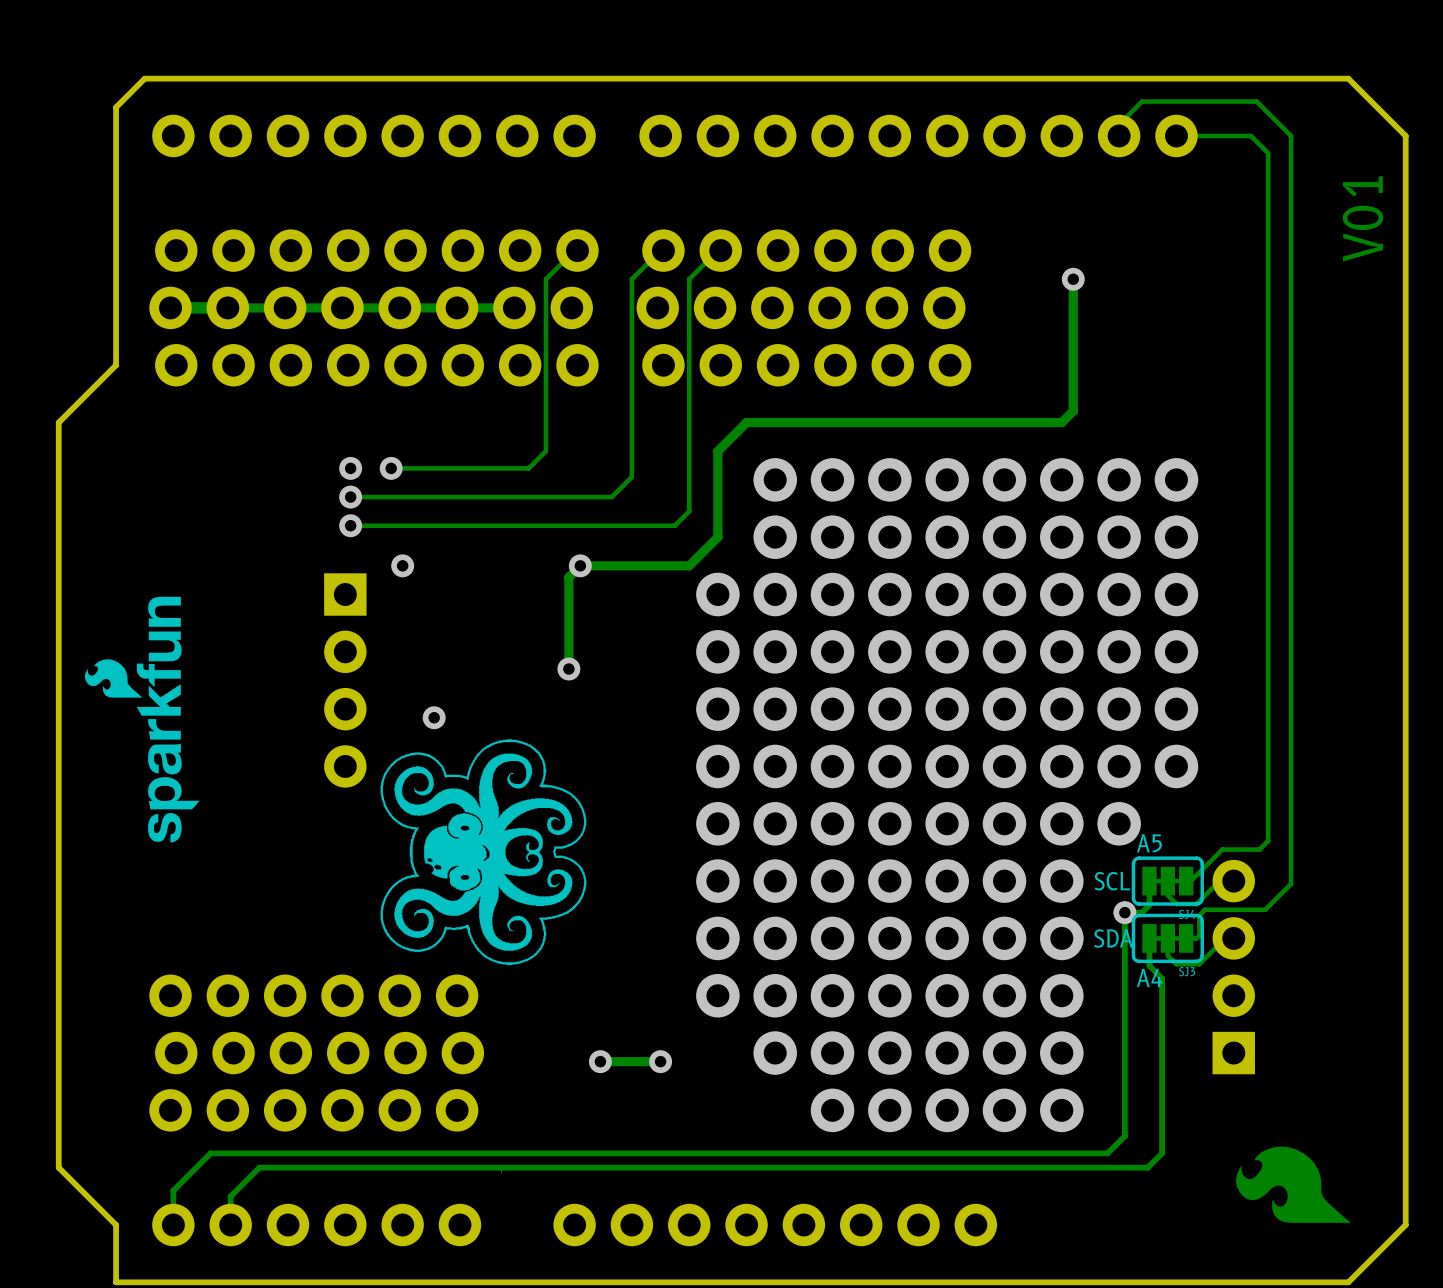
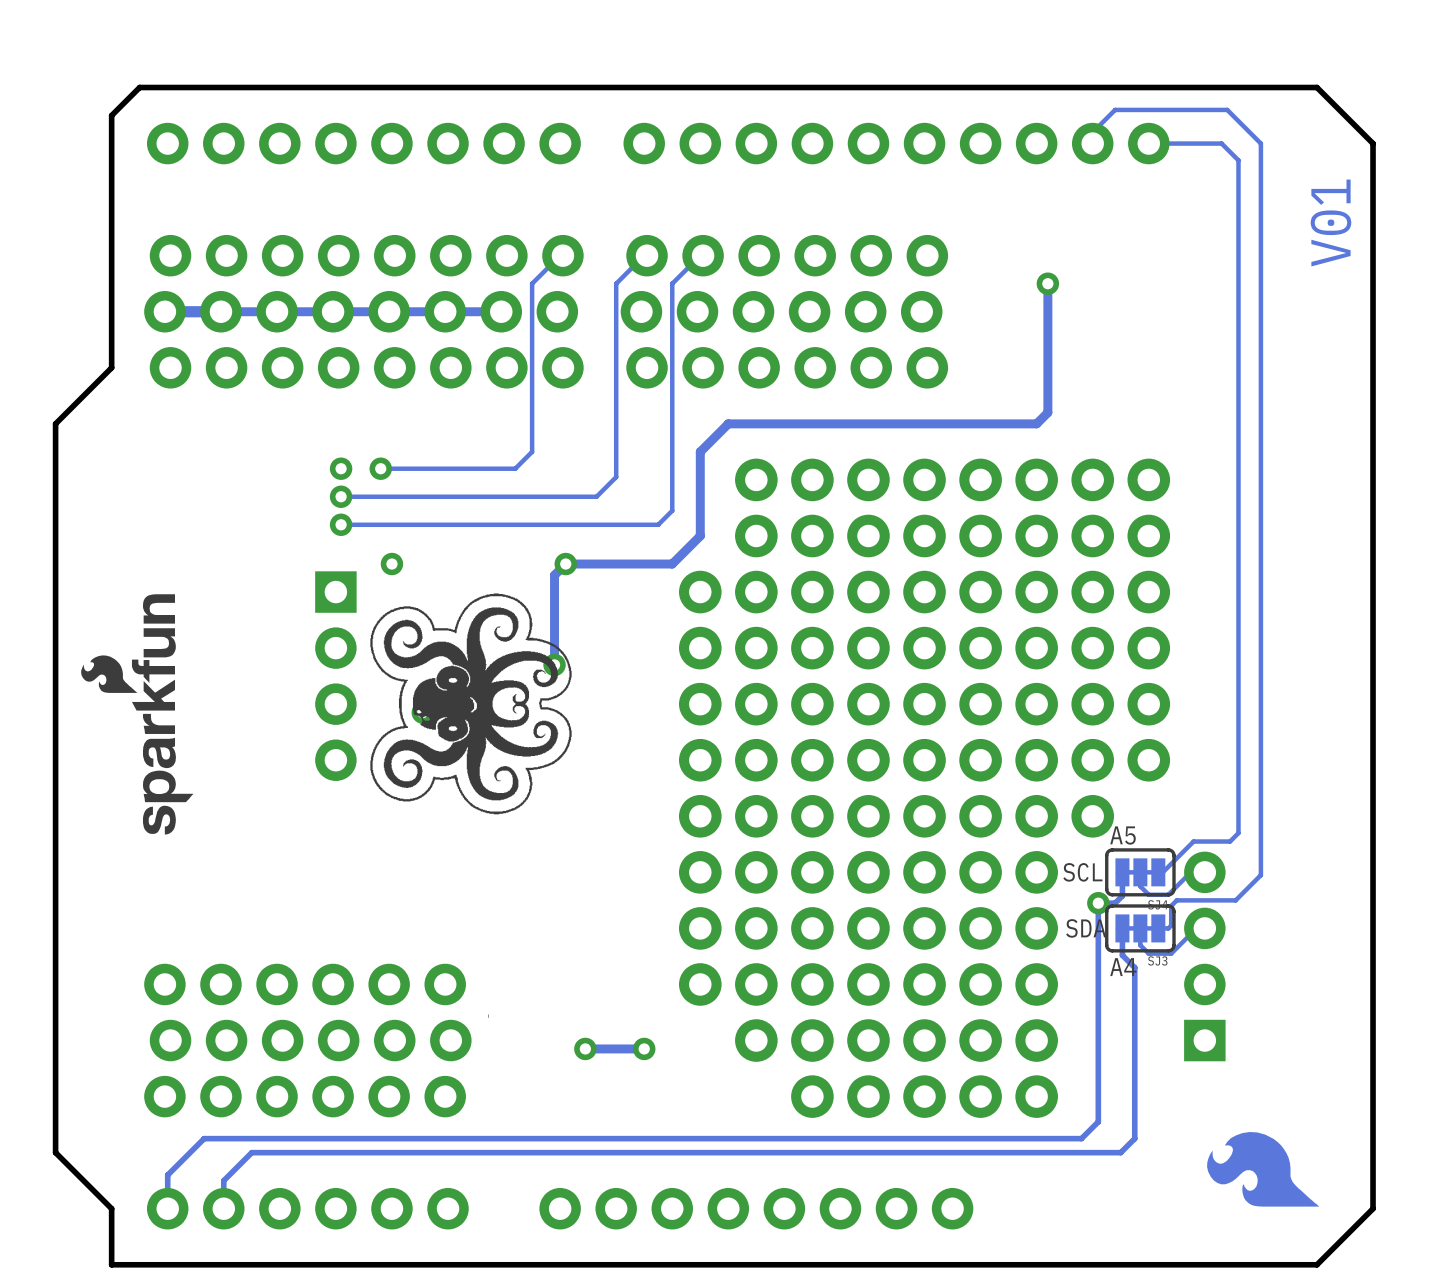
drawing position: (483, 956) -> (471, 805)

